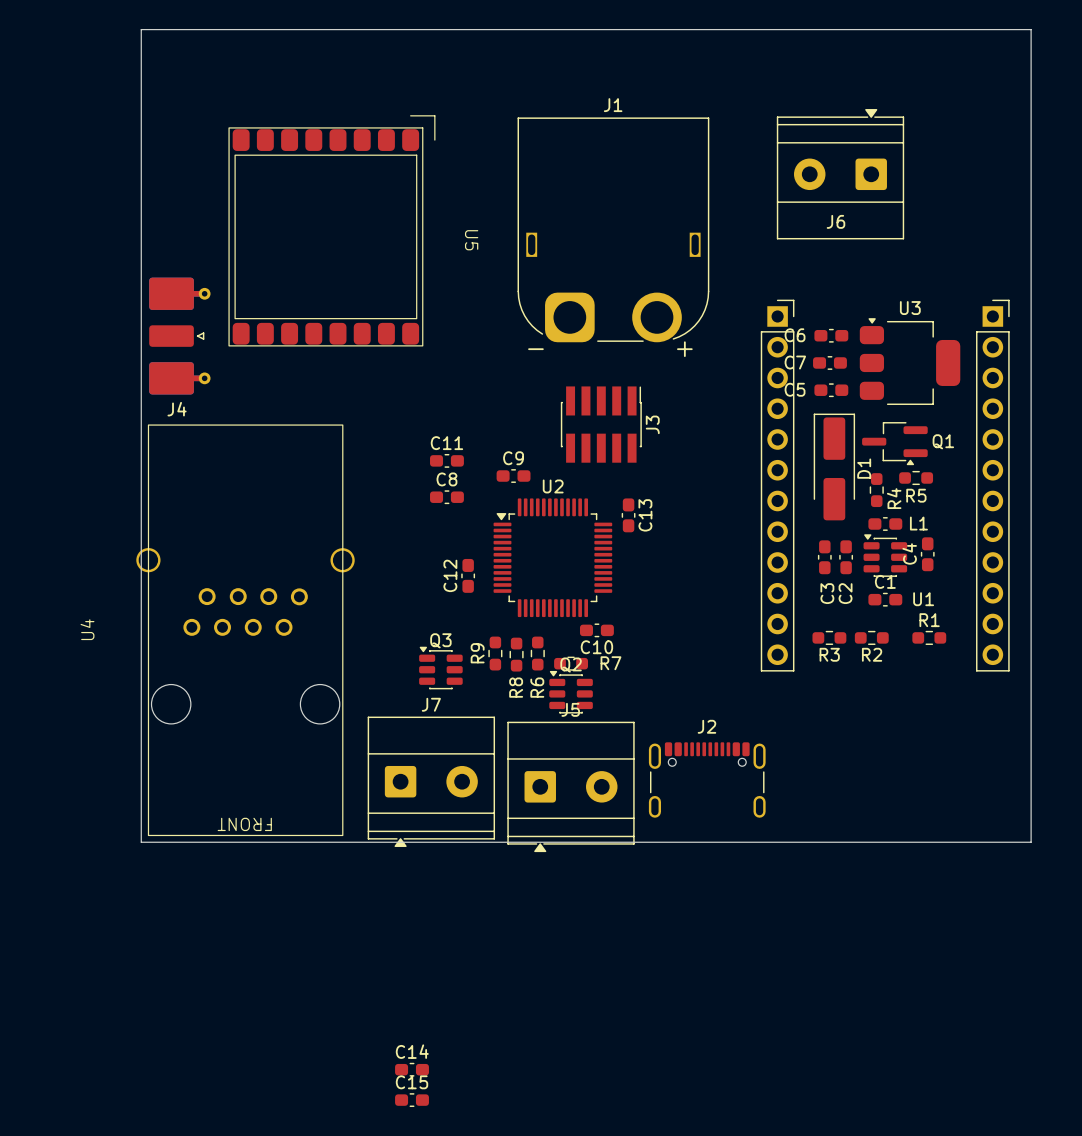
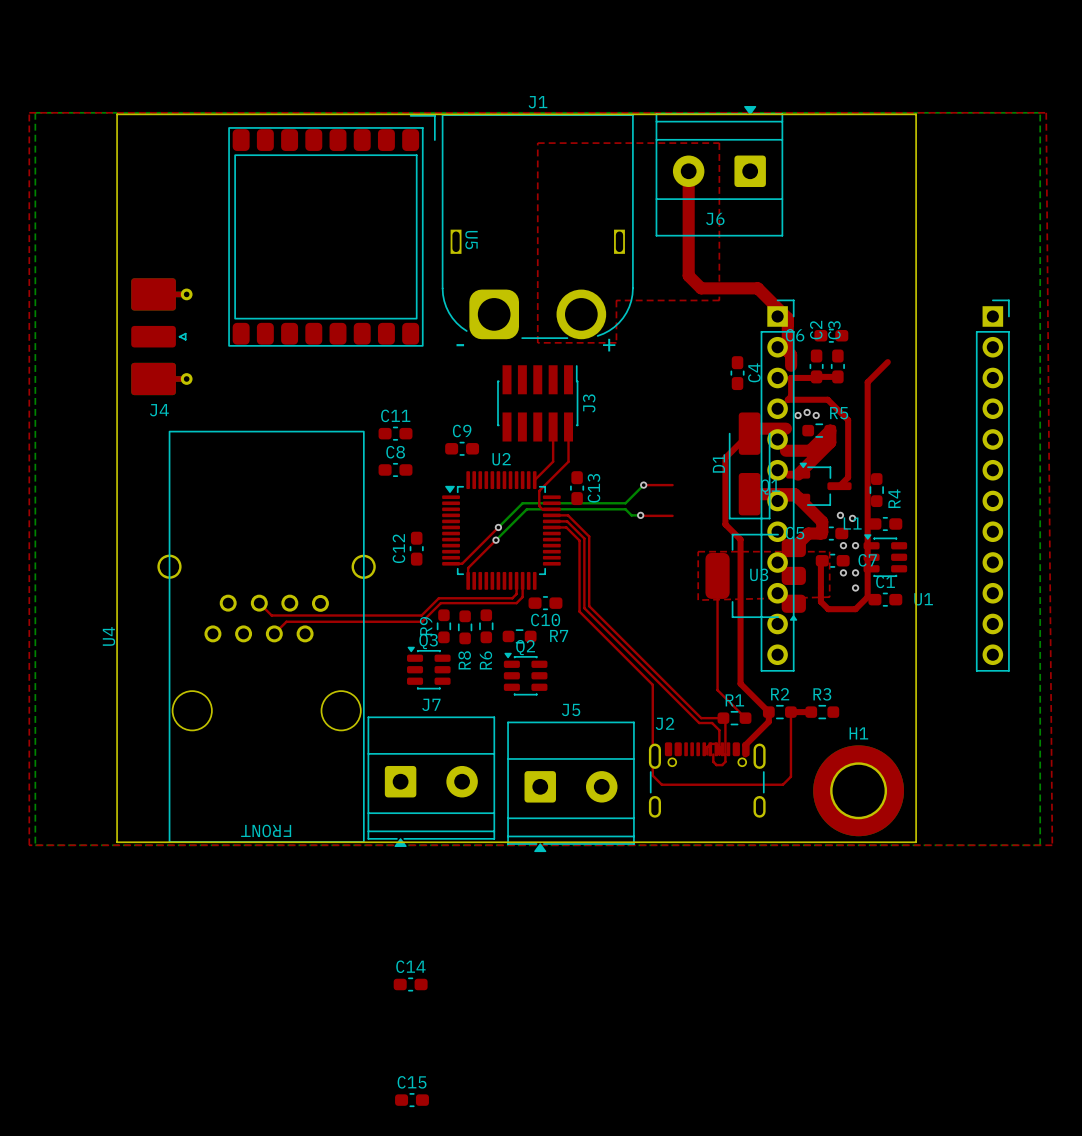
top zone outline: none -> (29, 112) (29, 845) (1052, 845) (1046, 112) (29, 112)
bottom zone outline: none -> (35, 112) (1040, 112) (1040, 845) (35, 845) (35, 112)
top zone outline: none -> (537, 143) (537, 342) (616, 342) (616, 300) (719, 300) (719, 143) (537, 143)
top track: none -> (688, 171) (688, 275) (701, 288) (757, 288) (787, 318) (787, 351) (791, 354) (791, 365)
J6 position: (840, 174) -> (719, 171)
J1 position: (613, 229) -> (537, 226)
U3 name position: U3 (910, 308) -> U3 (759, 574)
J4 position: (179, 336) -> (161, 336)
U3 rotation: 0° (910, 361) -> 180° (755, 577)
U3 position: (910, 361) -> (755, 577)
C7 name position: C7 (795, 362) -> C7 (867, 560)
C7 position: (829, 362) -> (832, 560)
top track: none -> (887, 362) (867, 382) (867, 597) (855, 609) (828, 609) (820, 601) (820, 564)
top track: none -> (837, 376) (791, 377) (791, 396) (787, 399) (827, 399) (848, 420) (848, 477) (839, 486)
C5 position: (831, 390) -> (831, 533)
via: none -> (807, 412)
via: none -> (798, 415)
via: none -> (816, 415)
J3 position: (601, 424) -> (537, 403)
top track: none -> (553, 426) (553, 461) (534, 480)
top track: none -> (568, 426) (568, 461) (539, 490) (539, 506) (542, 509) (551, 509)
top track: none -> (785, 428) (754, 428) (725, 457) (725, 524) (740, 539) (740, 683) (768, 712) (768, 721) (745, 745) (745, 754)
Q1 rotation: 0° (894, 443) -> 180° (818, 484)
Q1 position: (894, 443) -> (818, 484)
top track: none -> (785, 450) (810, 450) (830, 430) (830, 442) (798, 474)
C11 position: (446, 460) -> (395, 433)
D1 rotation: 0° (834, 466) -> 180° (749, 465)
D1 position: (834, 466) -> (749, 465)
C9 position: (513, 476) -> (462, 448)
R5 position: (916, 477) -> (819, 430)
top track: none -> (643, 485) (672, 485)
bottom track: none -> (643, 485) (625, 503) (522, 503) (498, 527)
via: none -> (643, 485)
top track: none -> (749, 494) (794, 494) (822, 521) (820, 533) (808, 533) (793, 548)
R5 name position: R5 (916, 495) -> R5 (839, 413)
C8 position: (446, 497) -> (395, 469)
top track: none -> (551, 515) (568, 515) (589, 536) (589, 606) (701, 718) (723, 718) (725, 720) (725, 761) (722, 765) (716, 765) (713, 761) (713, 754)
C13 position: (628, 515) -> (577, 488)
top track: none -> (640, 515) (672, 515)
bottom track: none -> (640, 515) (631, 515) (625, 509) (526, 509) (495, 540)
via: none -> (640, 515)
via: none -> (840, 515)
via: none -> (852, 518)
top track: none -> (551, 521) (567, 521) (584, 538) (584, 608) (699, 723) (712, 723) (719, 730) (719, 754)
L1 name position: L1 (918, 523) -> L1 (852, 523)
top track: none -> (498, 527) (462, 563) (451, 563)
via: none -> (498, 527)
top track: none -> (551, 527) (566, 527) (579, 540) (579, 611) (652, 684) (652, 775) (661, 784) (782, 784) (790, 776) (790, 712) (811, 712)
top track: none -> (495, 540) (468, 568) (468, 580)
via: none -> (495, 540)
via: none -> (843, 545)
via: none -> (855, 545)
top zone outline: none -> (698, 551) (698, 600) (829, 597) (829, 551) (698, 551)
C4 name position: C4 (909, 553) -> C4 (754, 372)
C4 position: (927, 554) -> (737, 373)
U2 position: (552, 557) -> (501, 530)
C3 position: (824, 557) -> (837, 366)
C2 position: (846, 557) -> (816, 366)
via: none -> (843, 572)
via: none -> (855, 572)
C12 position: (468, 575) -> (416, 548)
top track: none -> (717, 575) (717, 690) (745, 718)
top track: none -> (516, 580) (516, 594) (512, 598) (438, 598) (421, 615) (271, 615) (259, 603)
top track: none -> (522, 580) (522, 597) (516, 603) (440, 603) (422, 621) (286, 621) (274, 633)
via: none -> (855, 588)
C3 name position: C3 (827, 593) -> C3 (834, 330)
C2 name position: C2 (845, 593) -> C2 (816, 330)
U4 position: (245, 630) -> (266, 636)
C10 position: (596, 630) -> (545, 603)
R3 position: (829, 637) -> (822, 712)
R2 position: (871, 637) -> (779, 712)
R1 position: (929, 637) -> (734, 718)
R9 position: (495, 653) -> (443, 626)
R6 position: (537, 653) -> (486, 626)
R8 position: (516, 654) -> (465, 627)
R3 name position: R3 (829, 654) -> R3 (822, 694)
R2 name position: R2 (872, 654) -> R2 (780, 694)
R7 position: (571, 663) -> (519, 636)
Q3 position: (440, 668) -> (428, 668)
Q2 position: (571, 692) -> (525, 674)
J2 name position: J2 (706, 726) -> J2 (664, 723)
top track: none -> (719, 747) (716, 743) (710, 743) (707, 747) (707, 754)
H1: none -> (858, 790)
board edge: (141, 842) (141, 29) (1031, 29) (1031, 842) (916, 842) -> (141, 842) (117, 842) (117, 114) (916, 114) (916, 842)
C14 position: (412, 1069) -> (410, 984)

